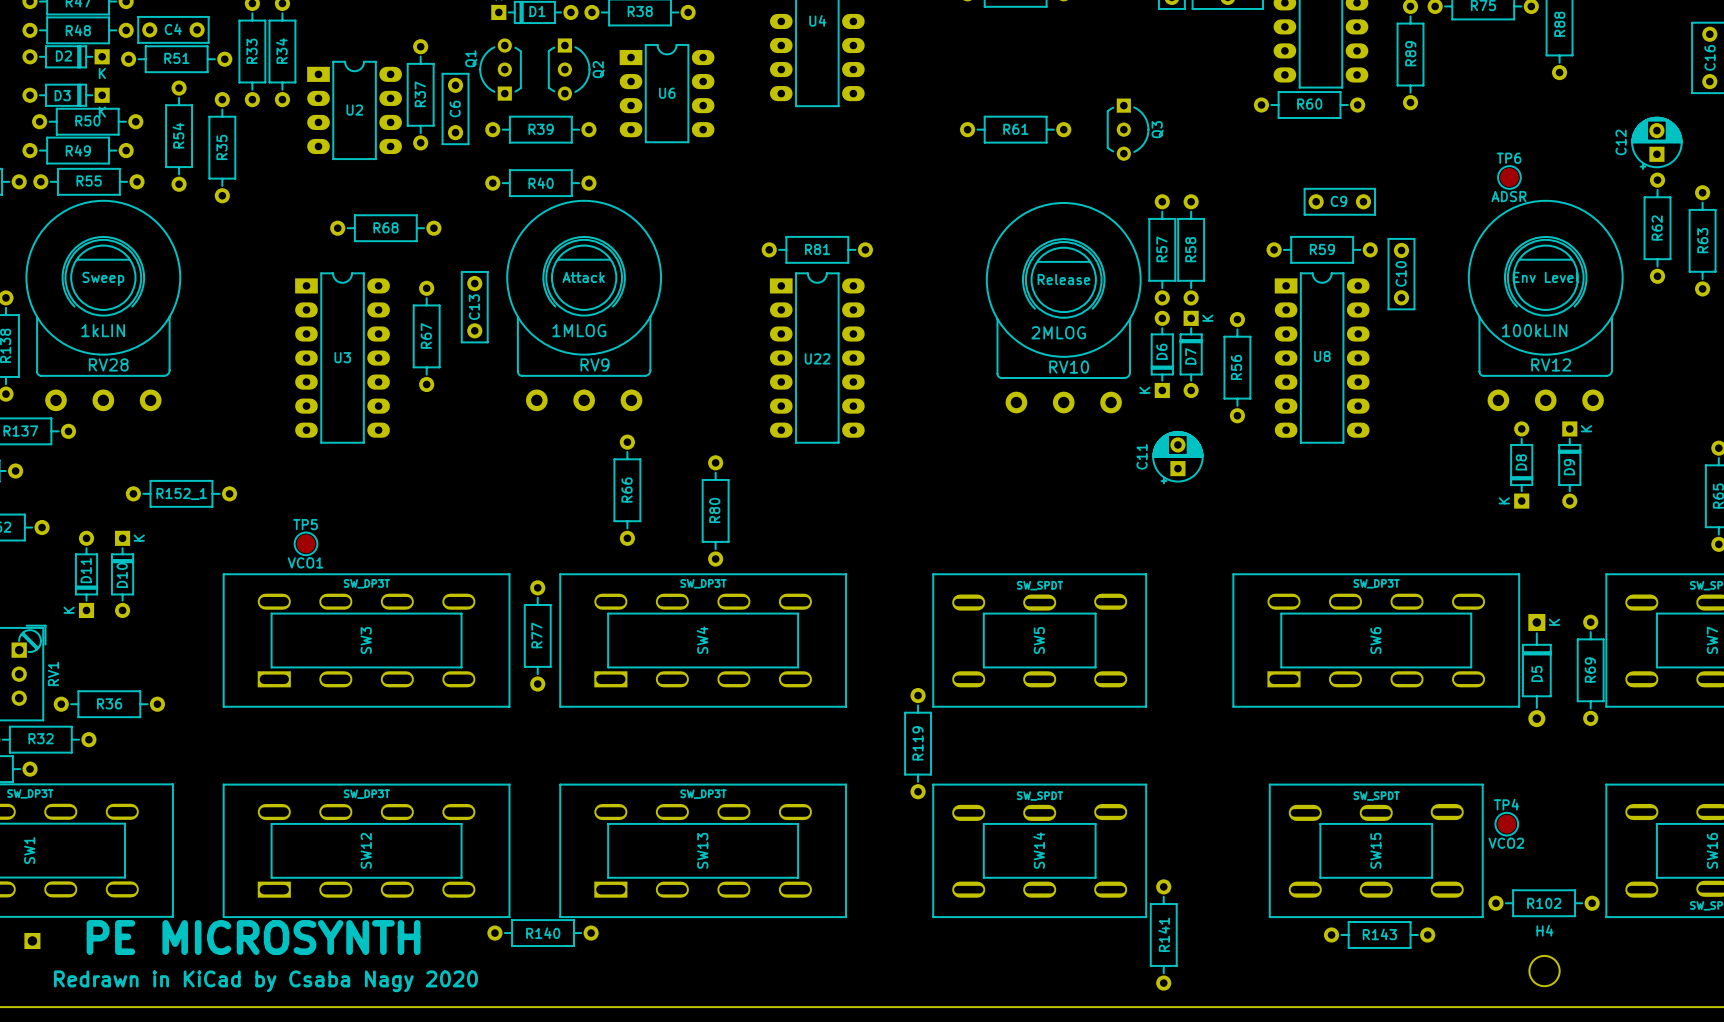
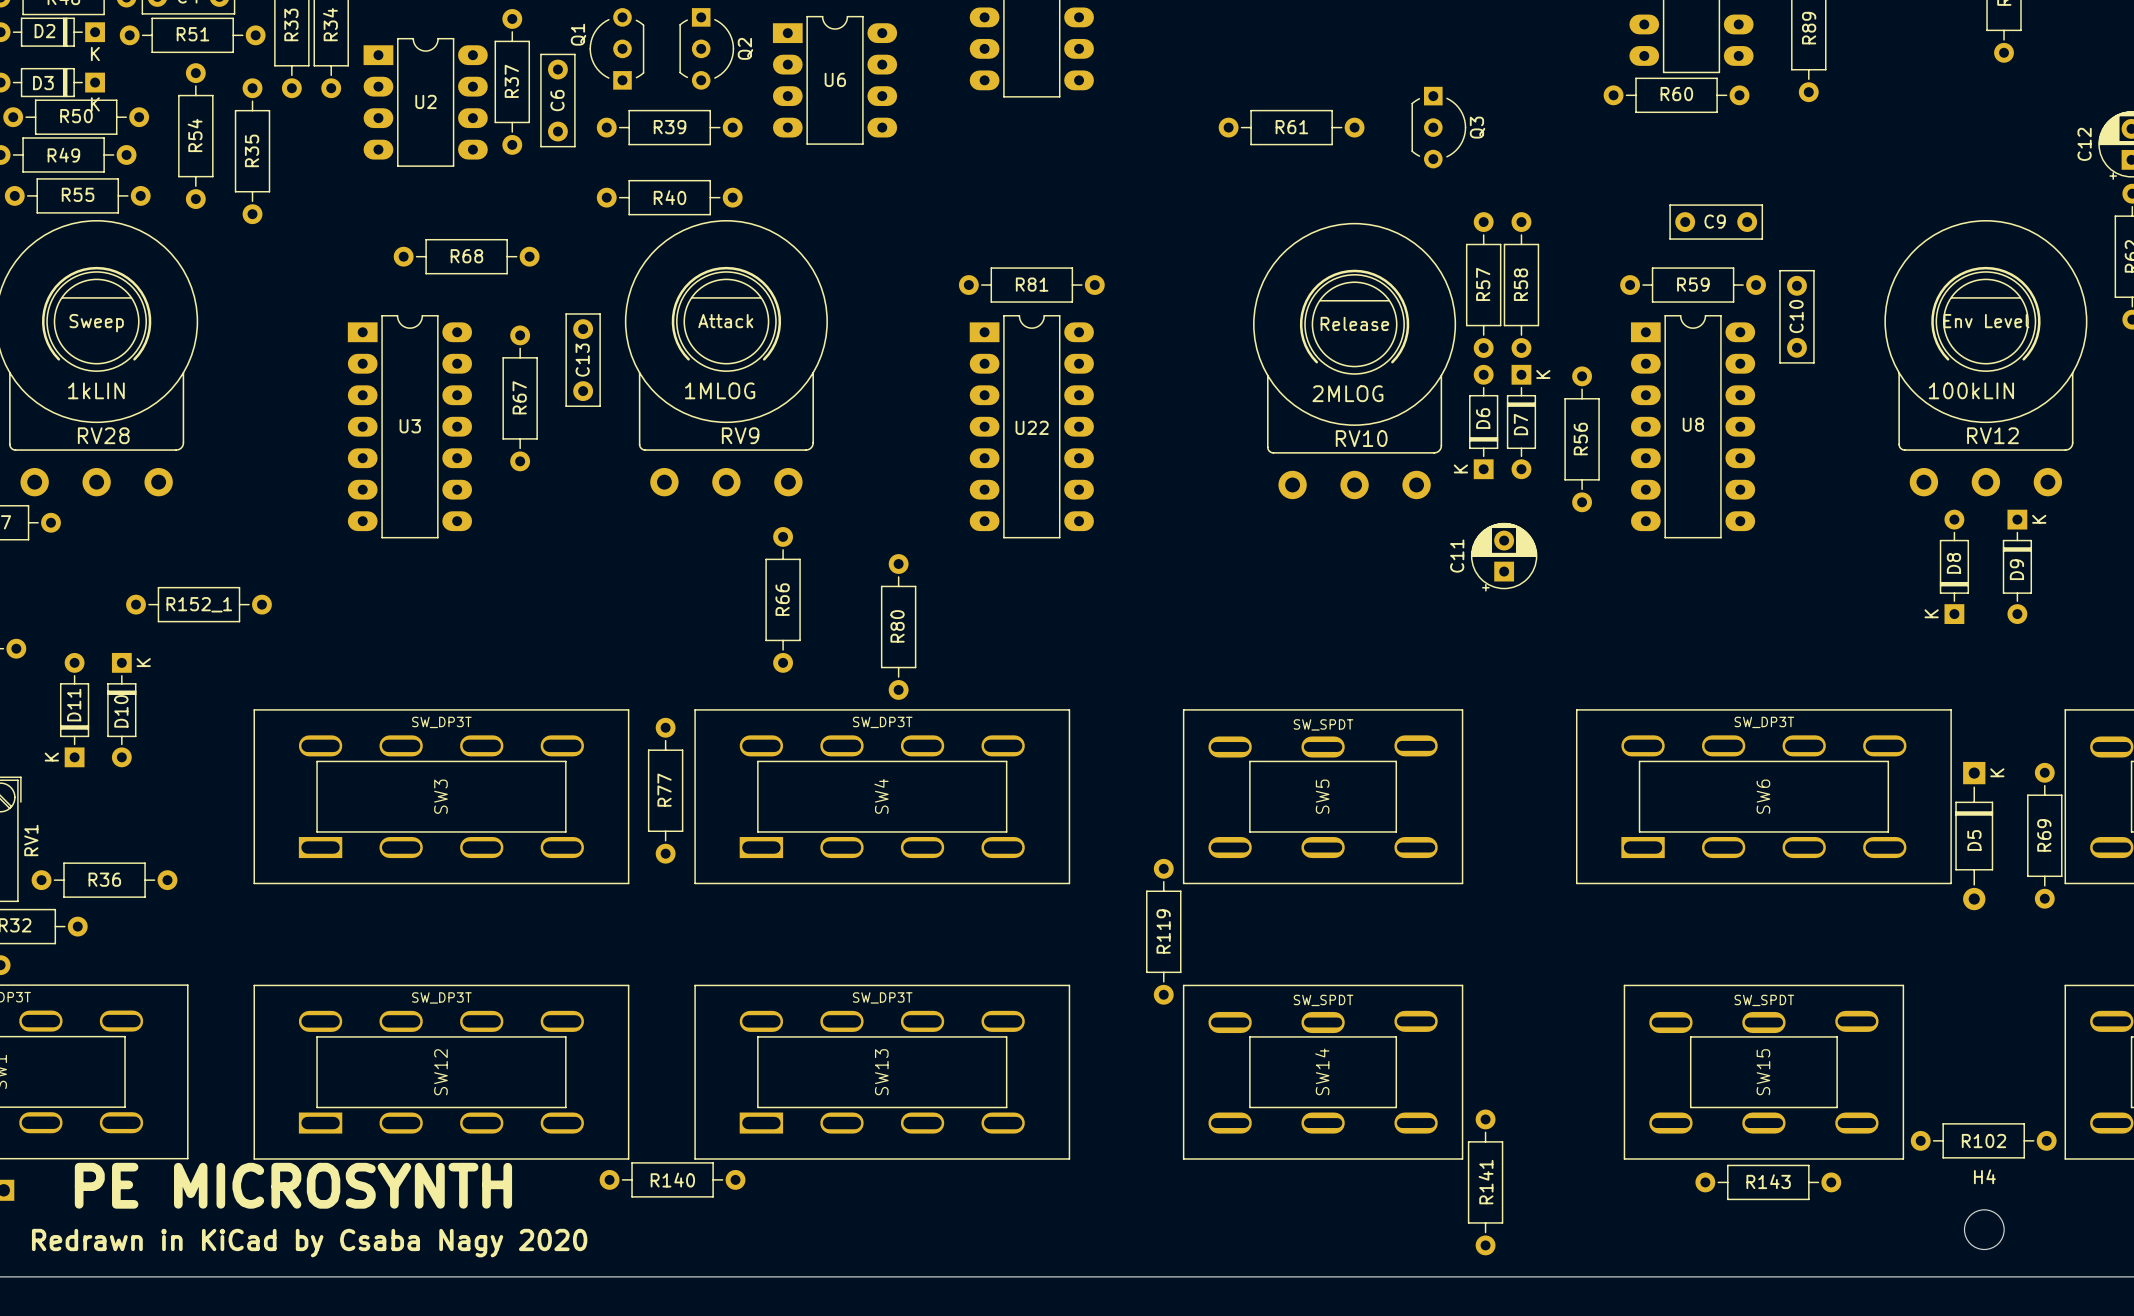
TP6: ADSR (1509, 177) -> none
TP5: VCO1 (306, 543) -> none
TP4: VCO2 (1506, 824) -> none

